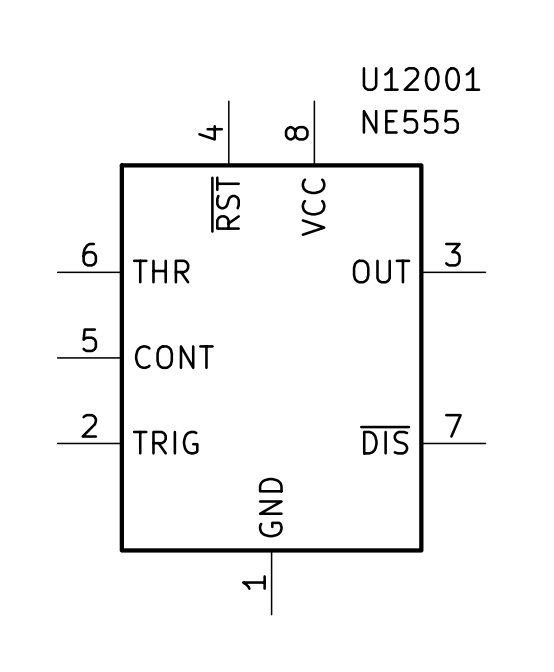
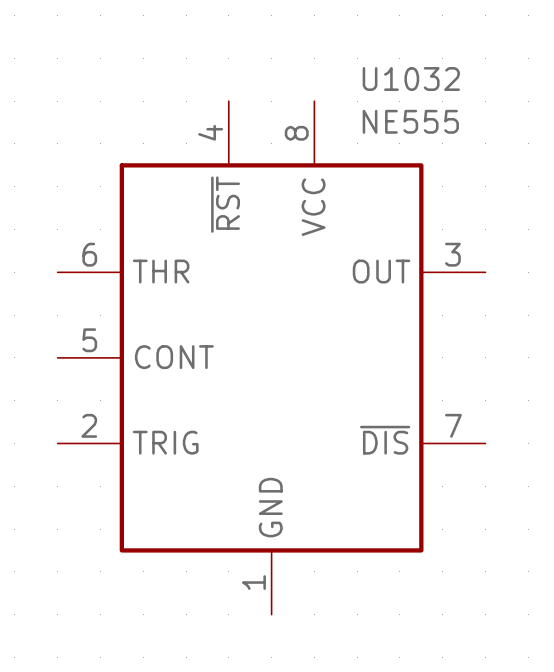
U12001 name: U12001 (421, 79) -> U1032 (411, 79)

